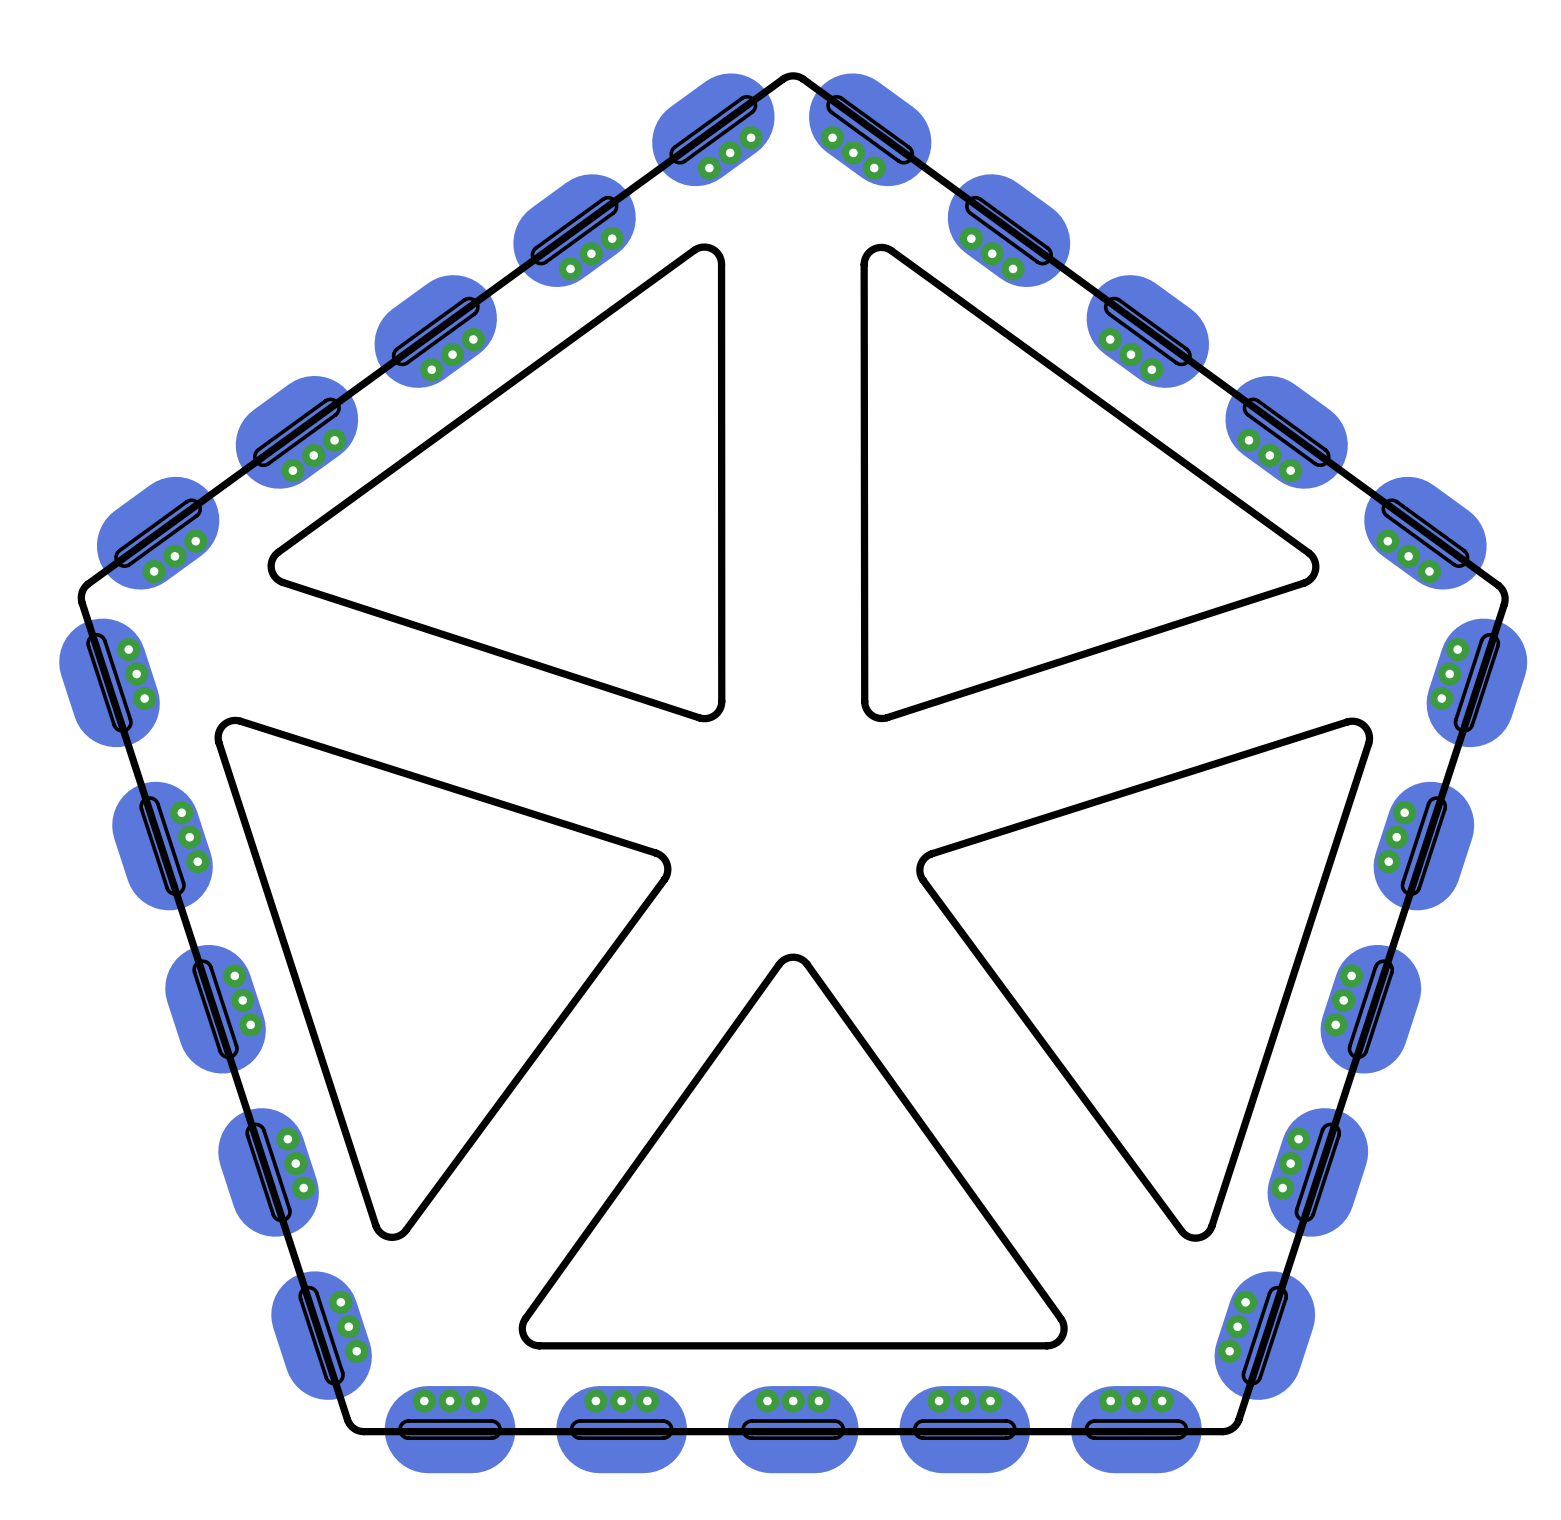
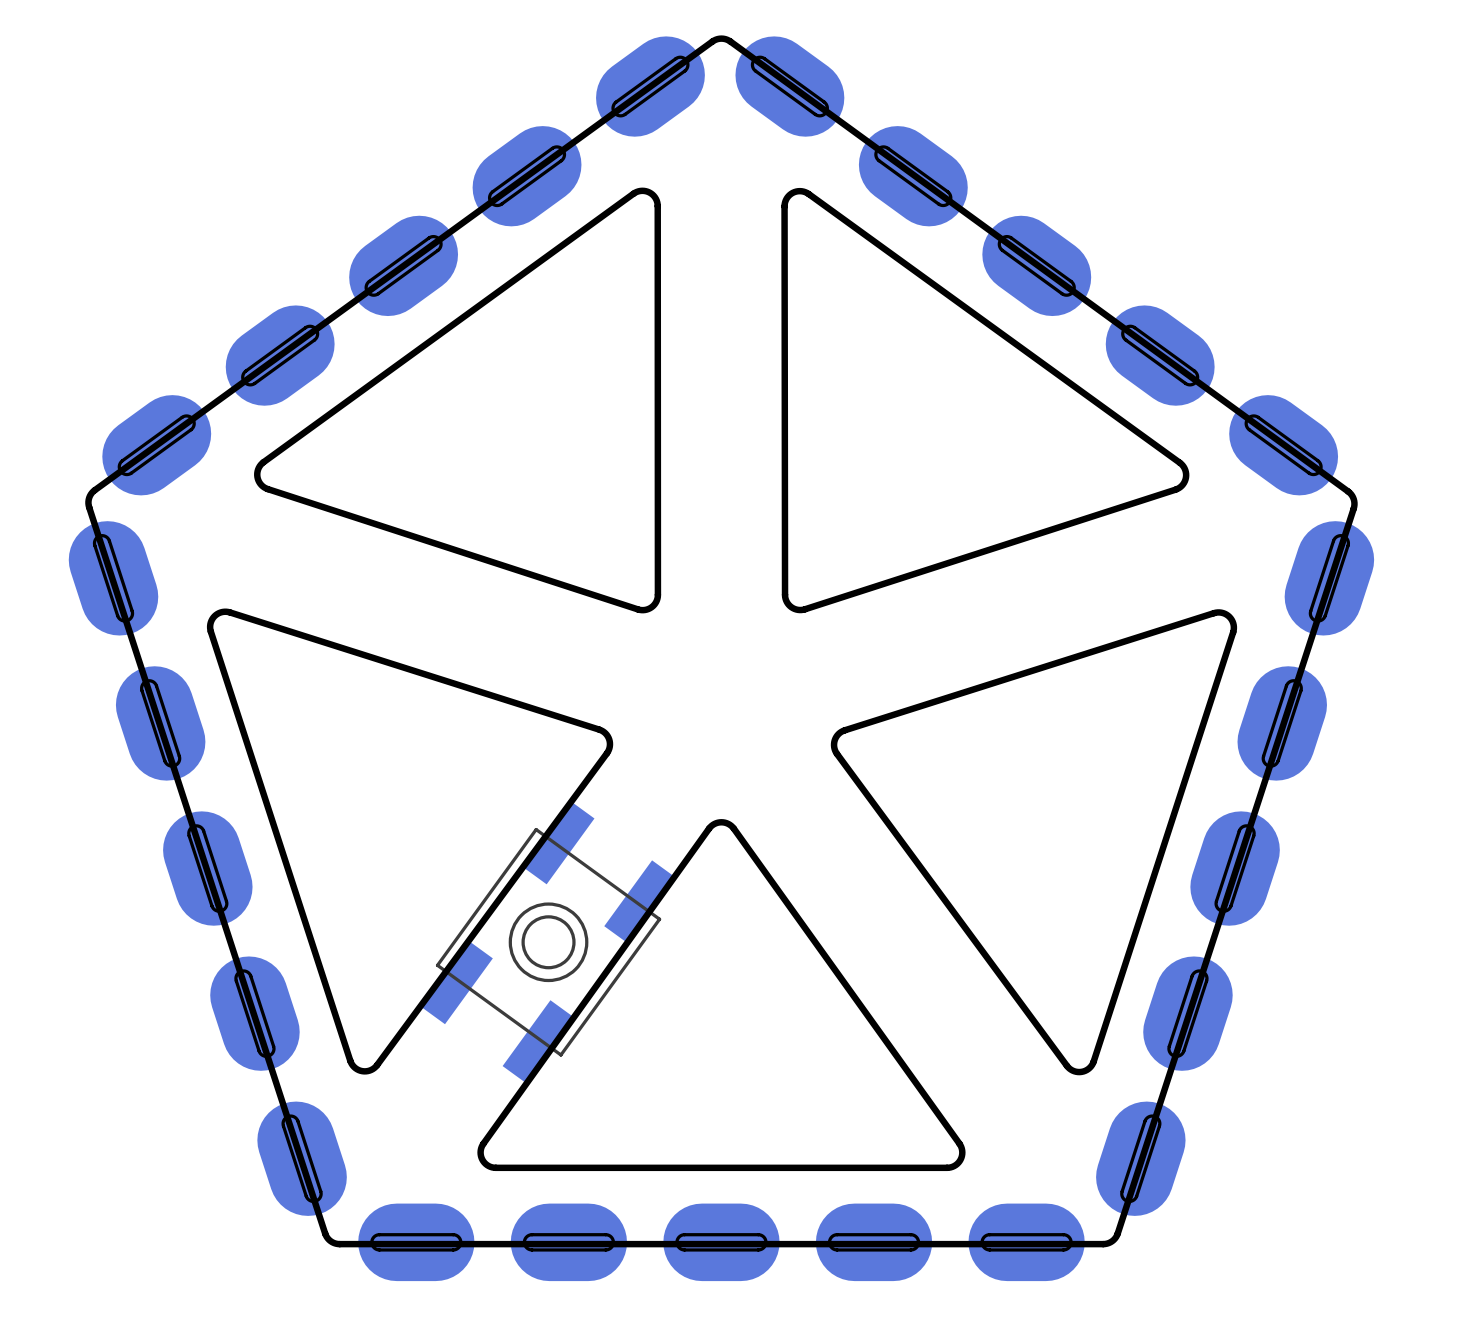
part footprint: [96, 73, 775, 590] -> [102, 36, 705, 496]
part footprint: [808, 73, 1487, 590] -> [735, 36, 1339, 496]
part footprint: [59, 618, 372, 1400] -> [68, 521, 347, 1216]
part footprint: [1214, 618, 1528, 1400] -> [1096, 521, 1375, 1216]
part: none -> (548, 942)
part footprint: [384, 1386, 1202, 1474] -> [358, 1203, 1085, 1282]

